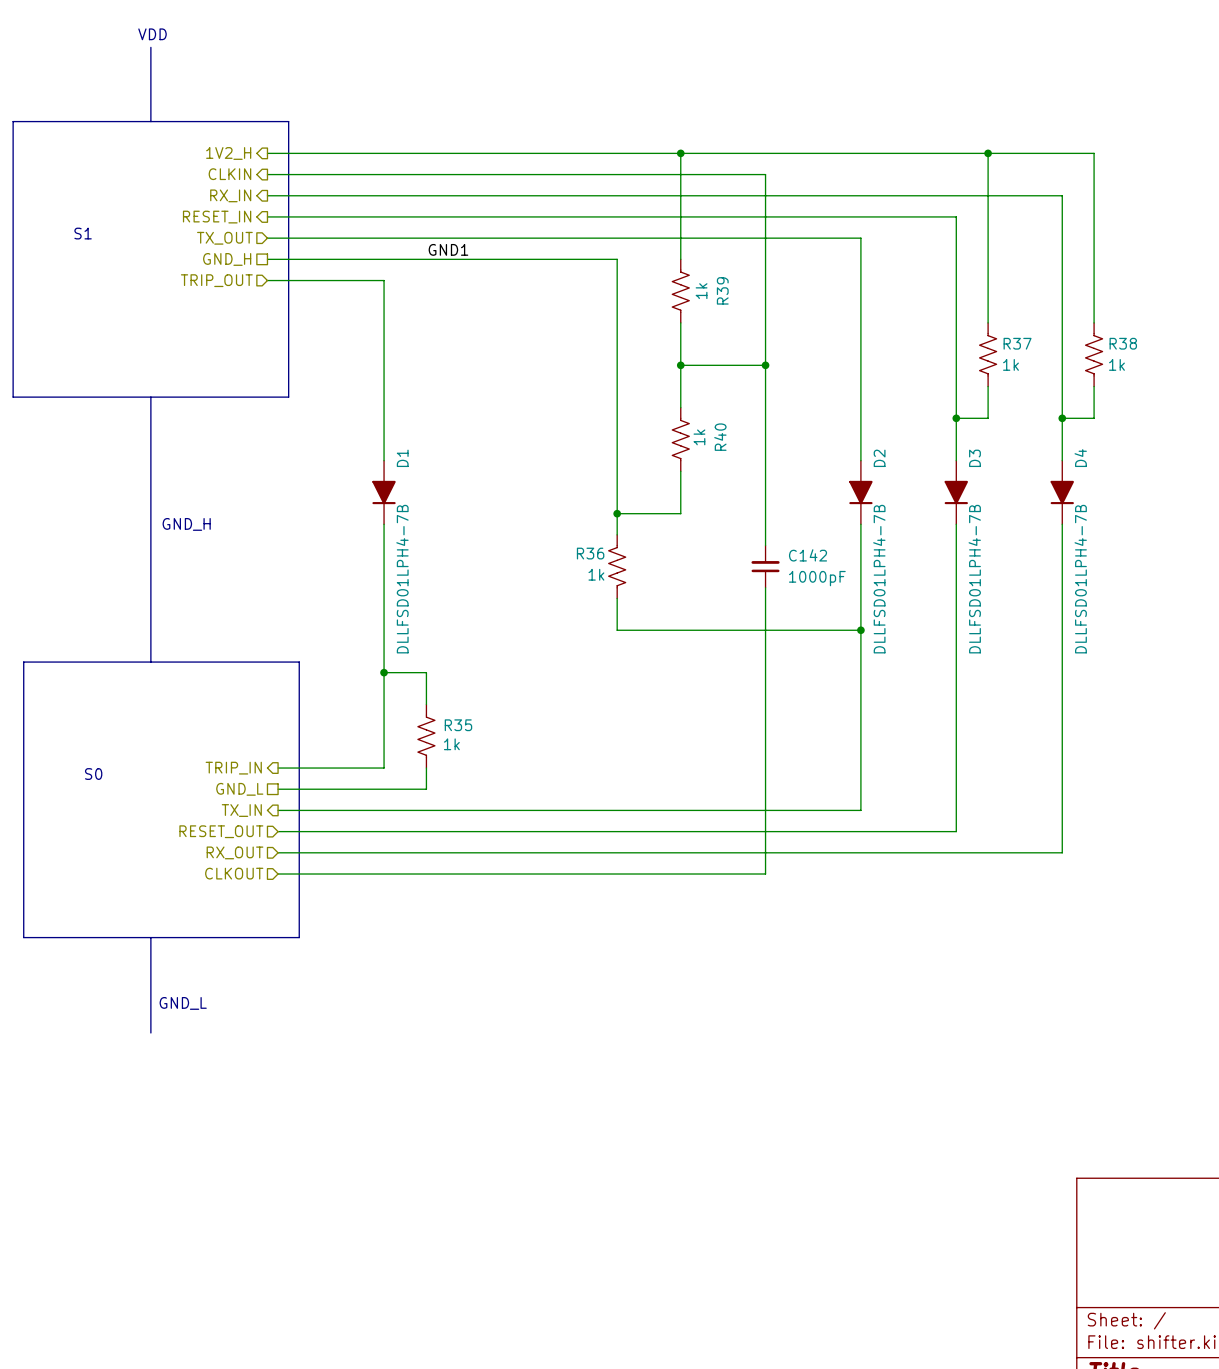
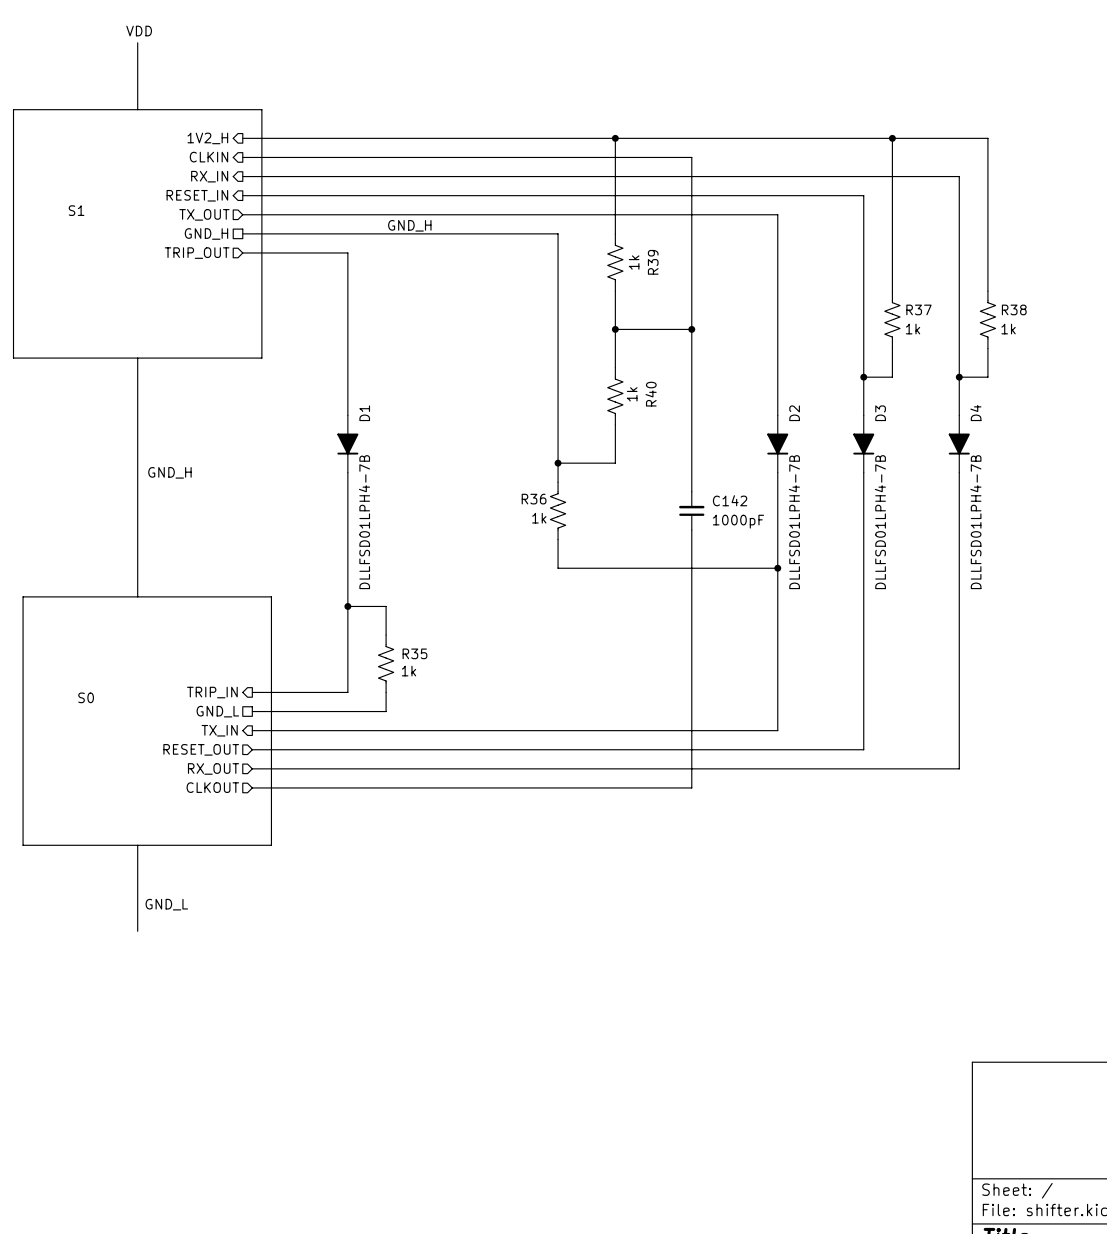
label: GND1 (448, 249) -> GND_H (409, 225)

